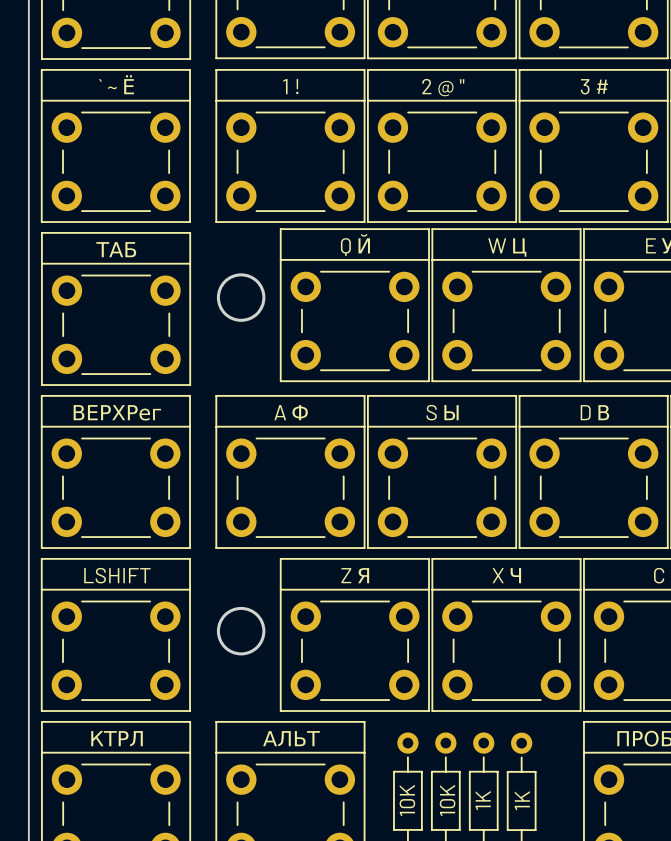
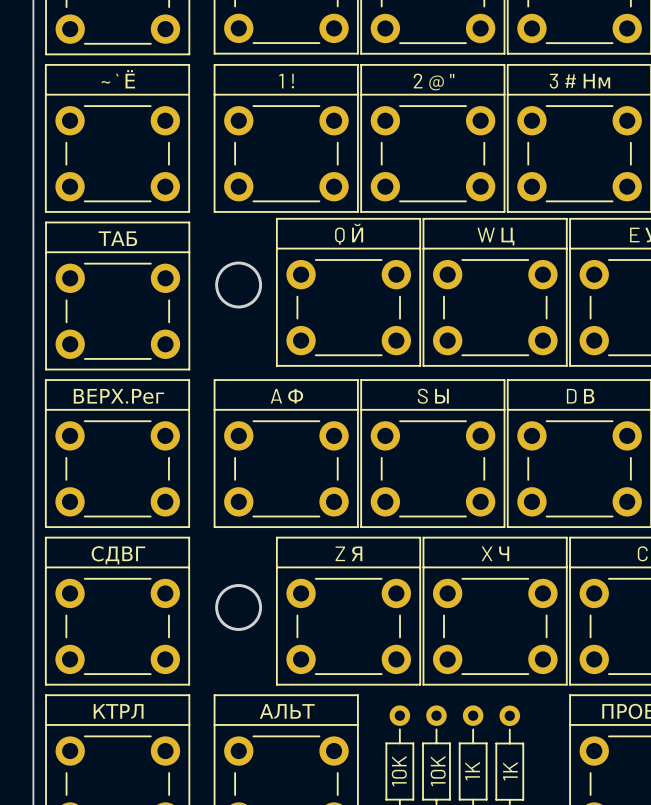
part value: ` ~ Ё (116, 84) -> ~ ` Ё (118, 79)
part value: 3 # (594, 86) -> 3 # Нм (579, 81)
part value: ВЕРХРег (117, 412) -> ВЕРХ.Рег (118, 396)
part value: LSHIFT (117, 575) -> СДВГ (118, 555)

